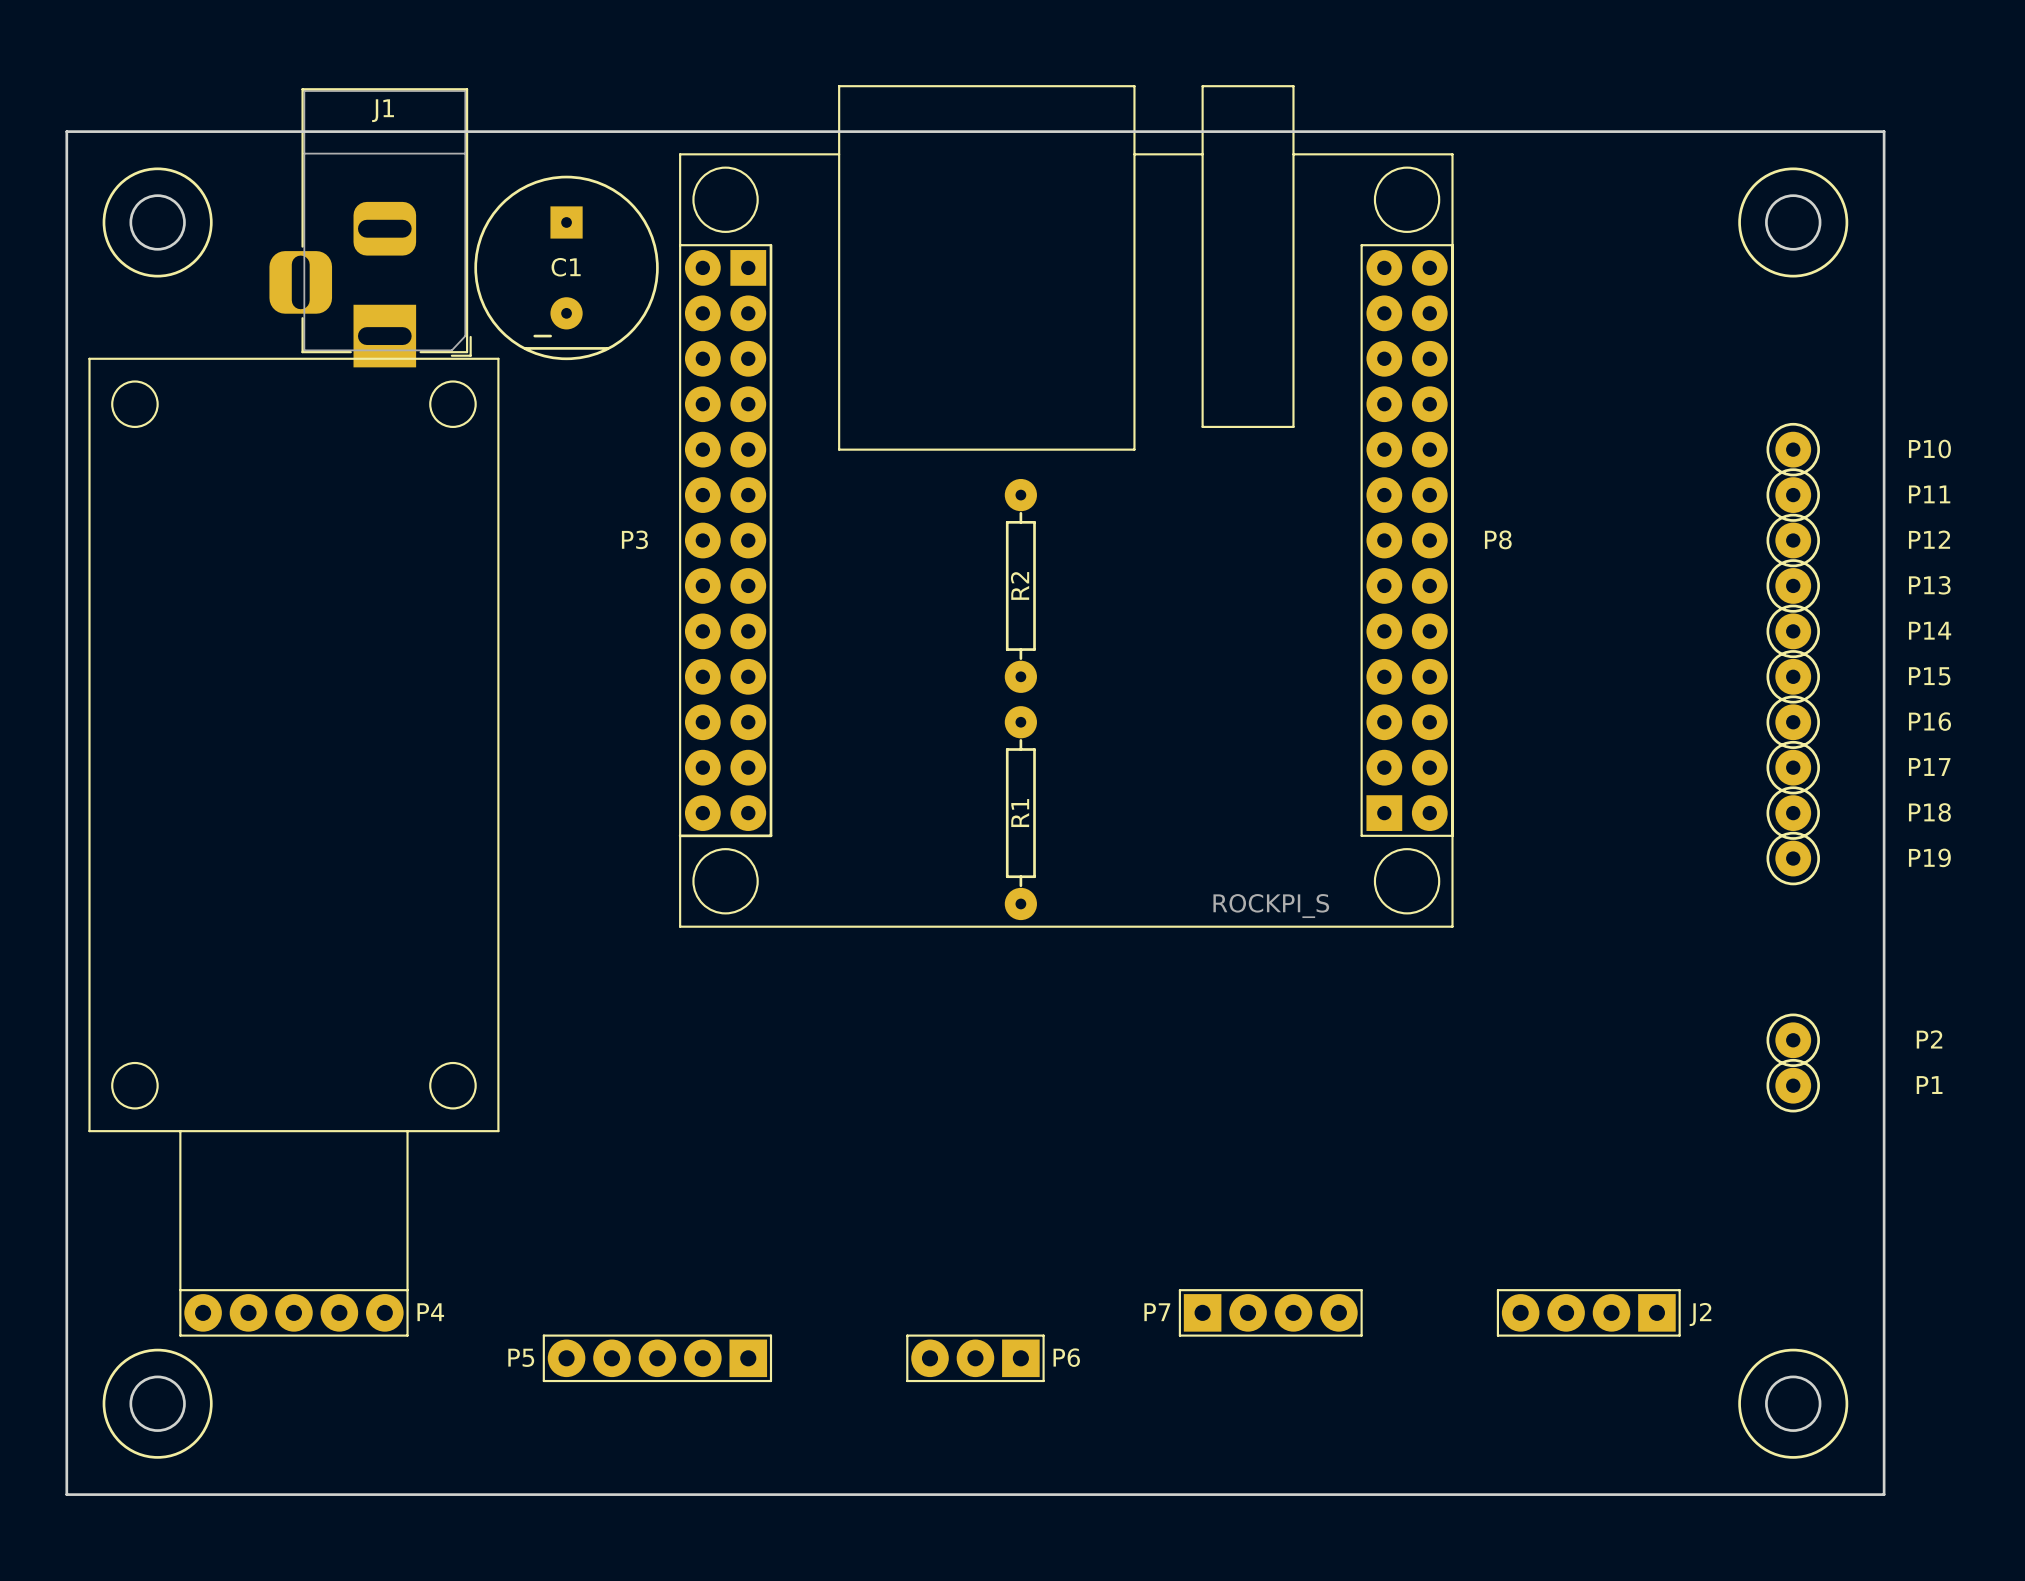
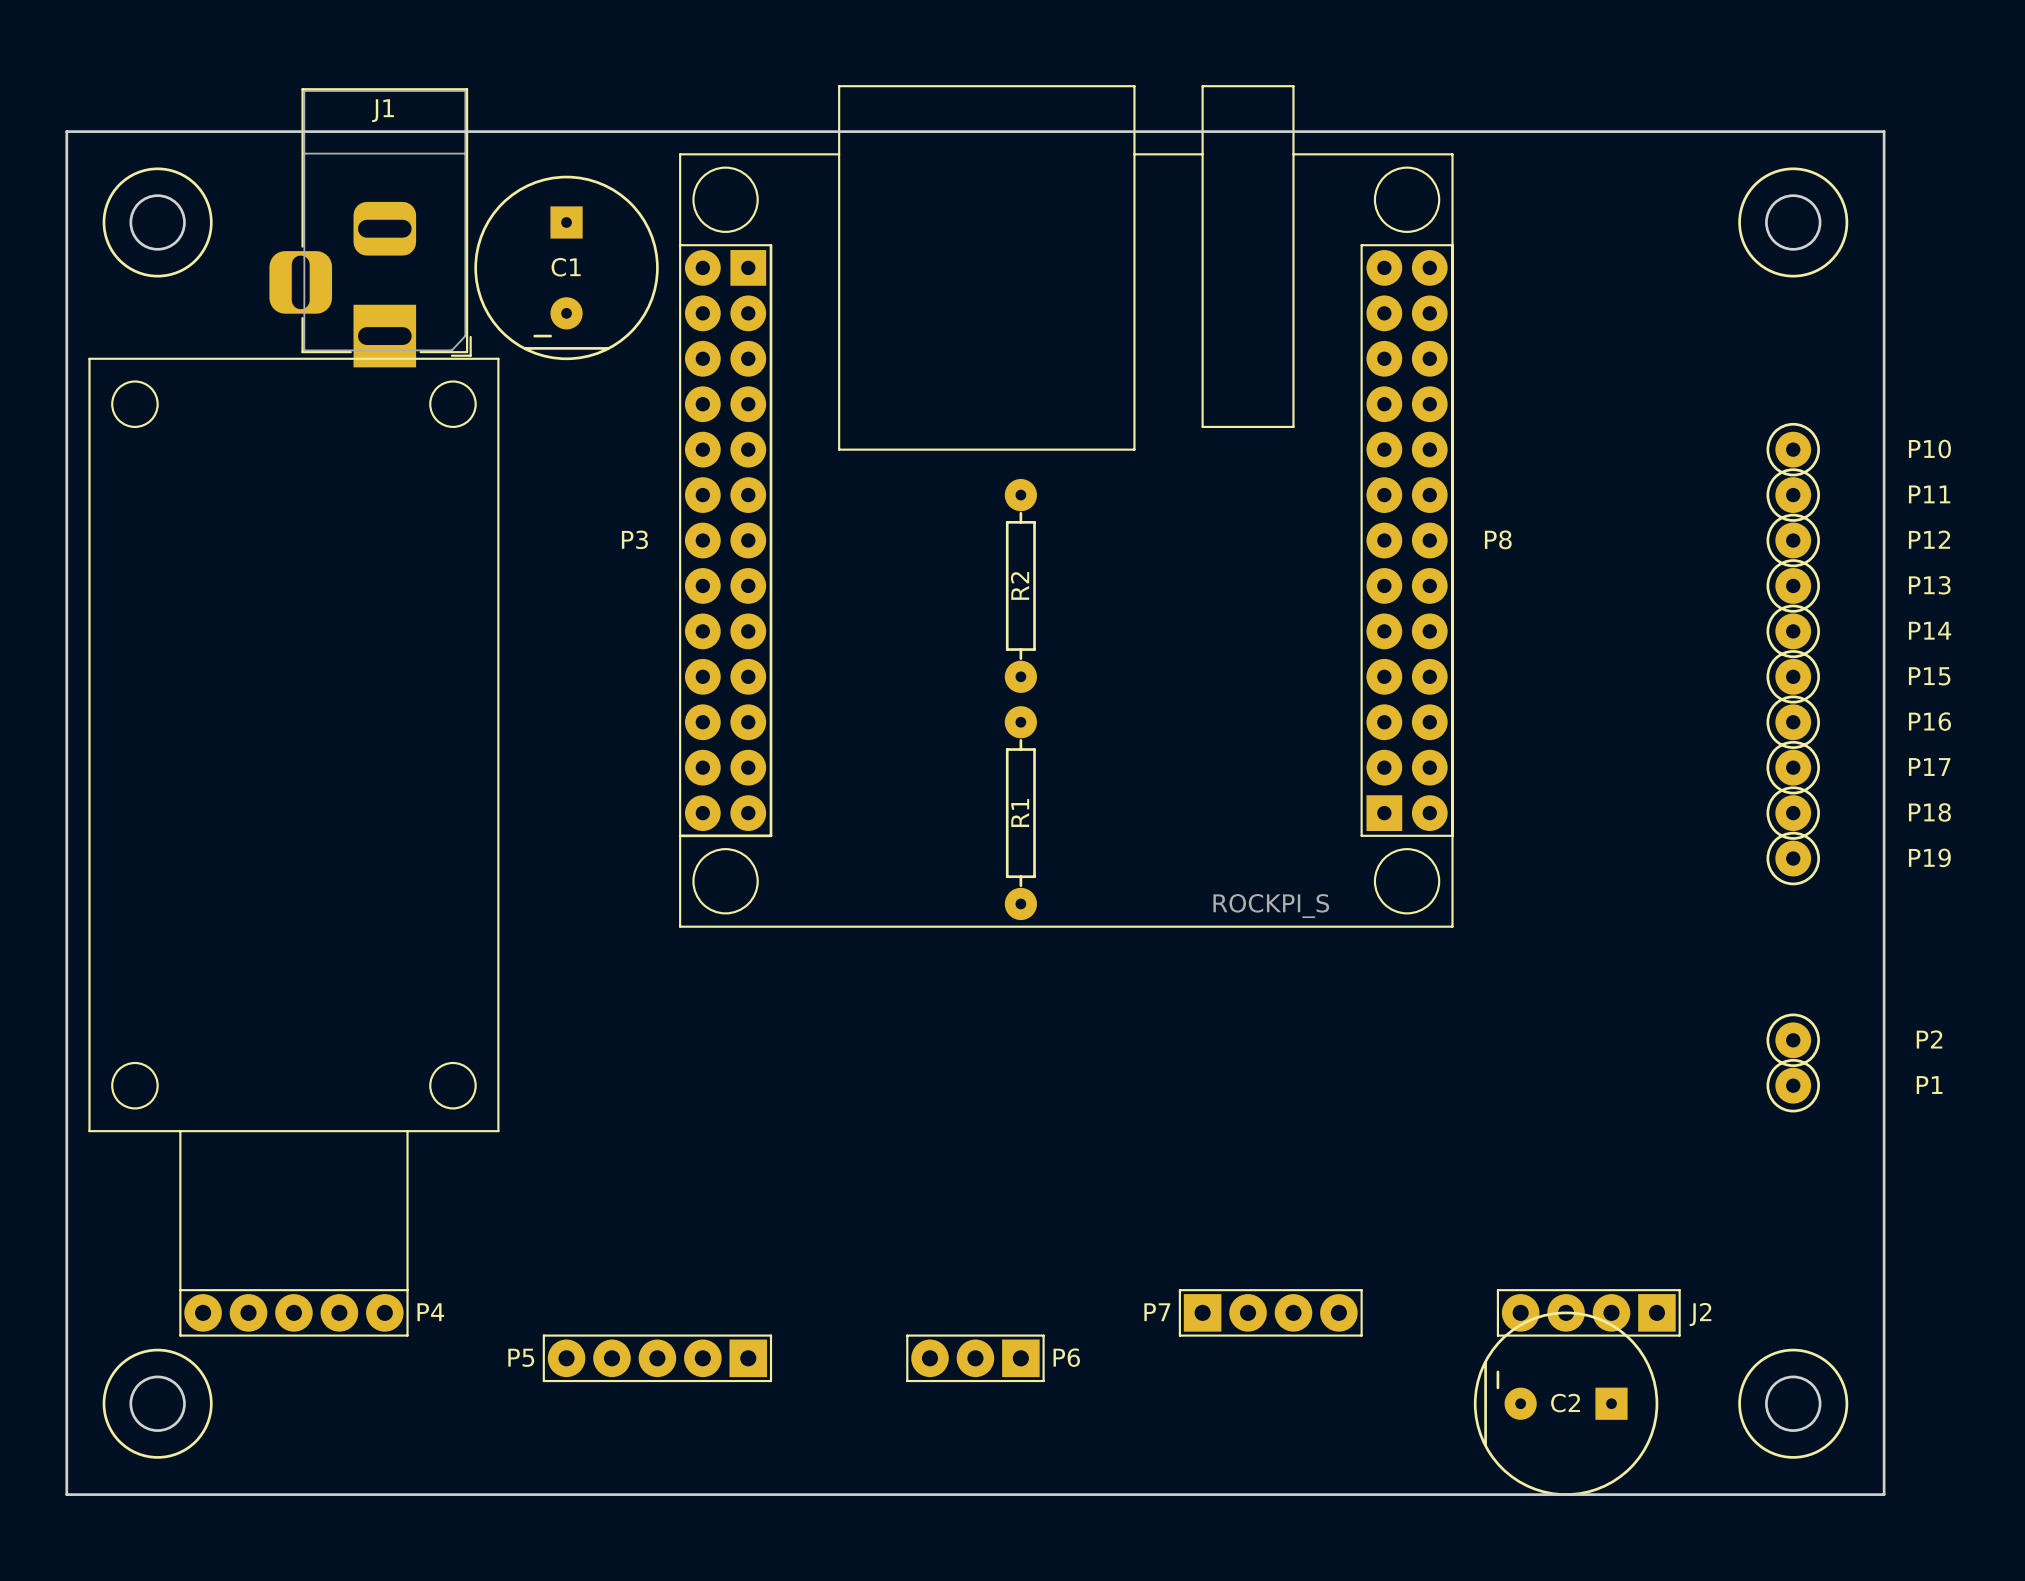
C2: none -> (1566, 1403)

